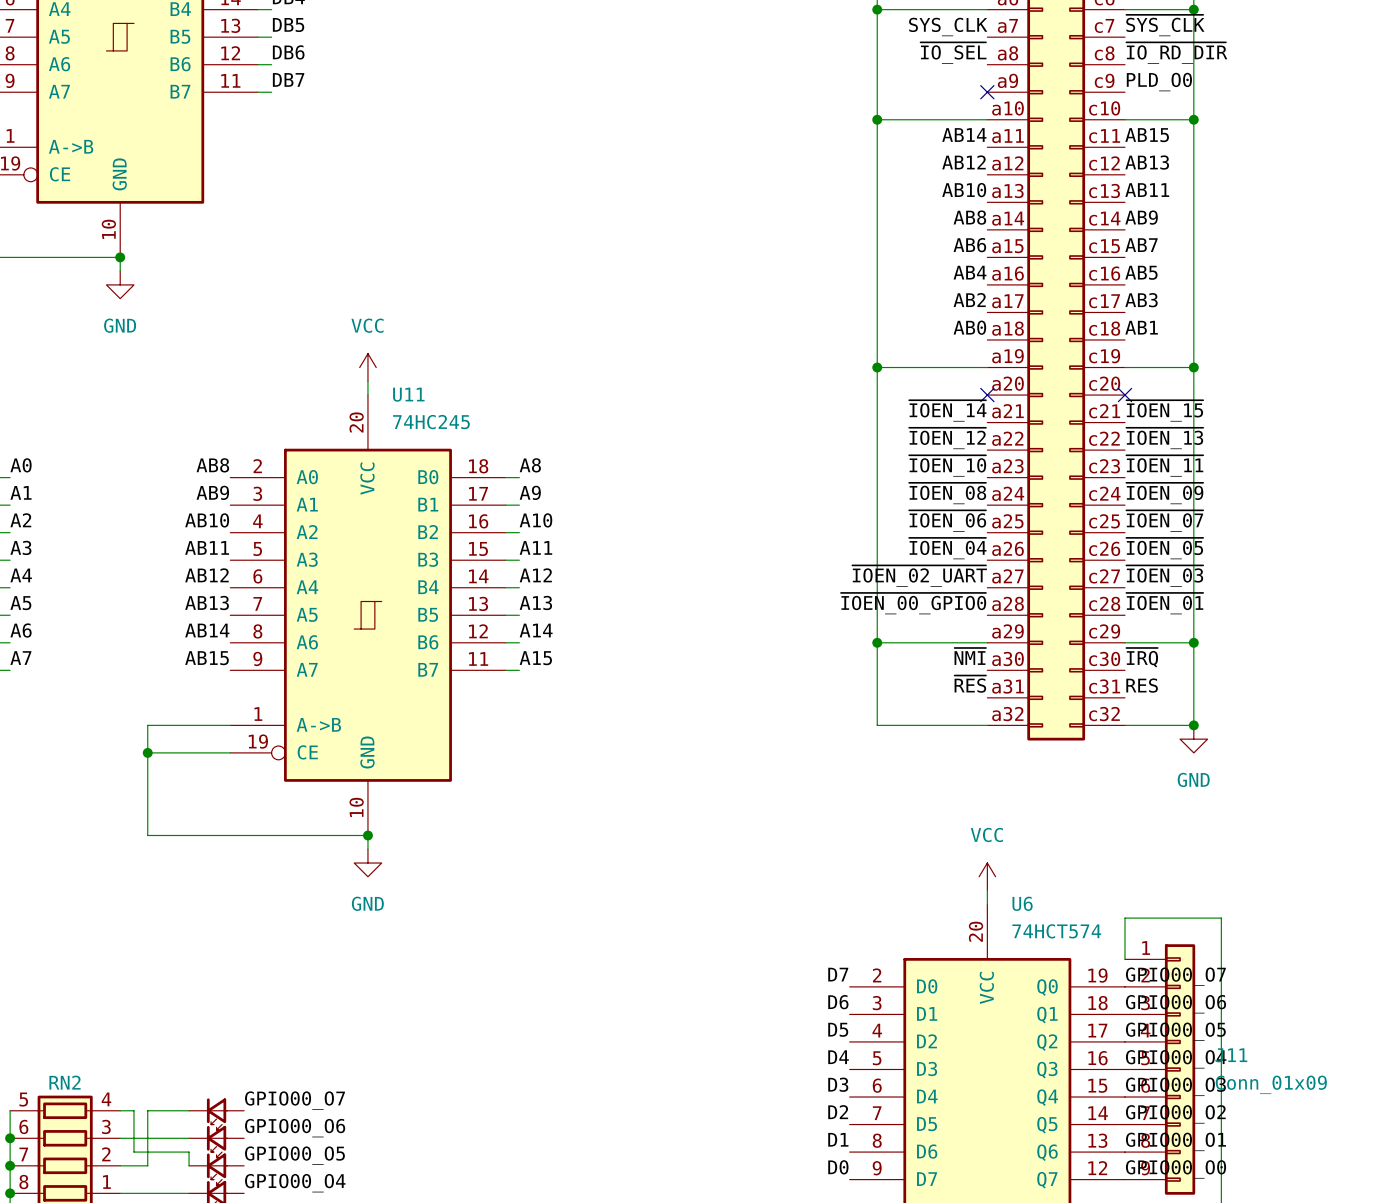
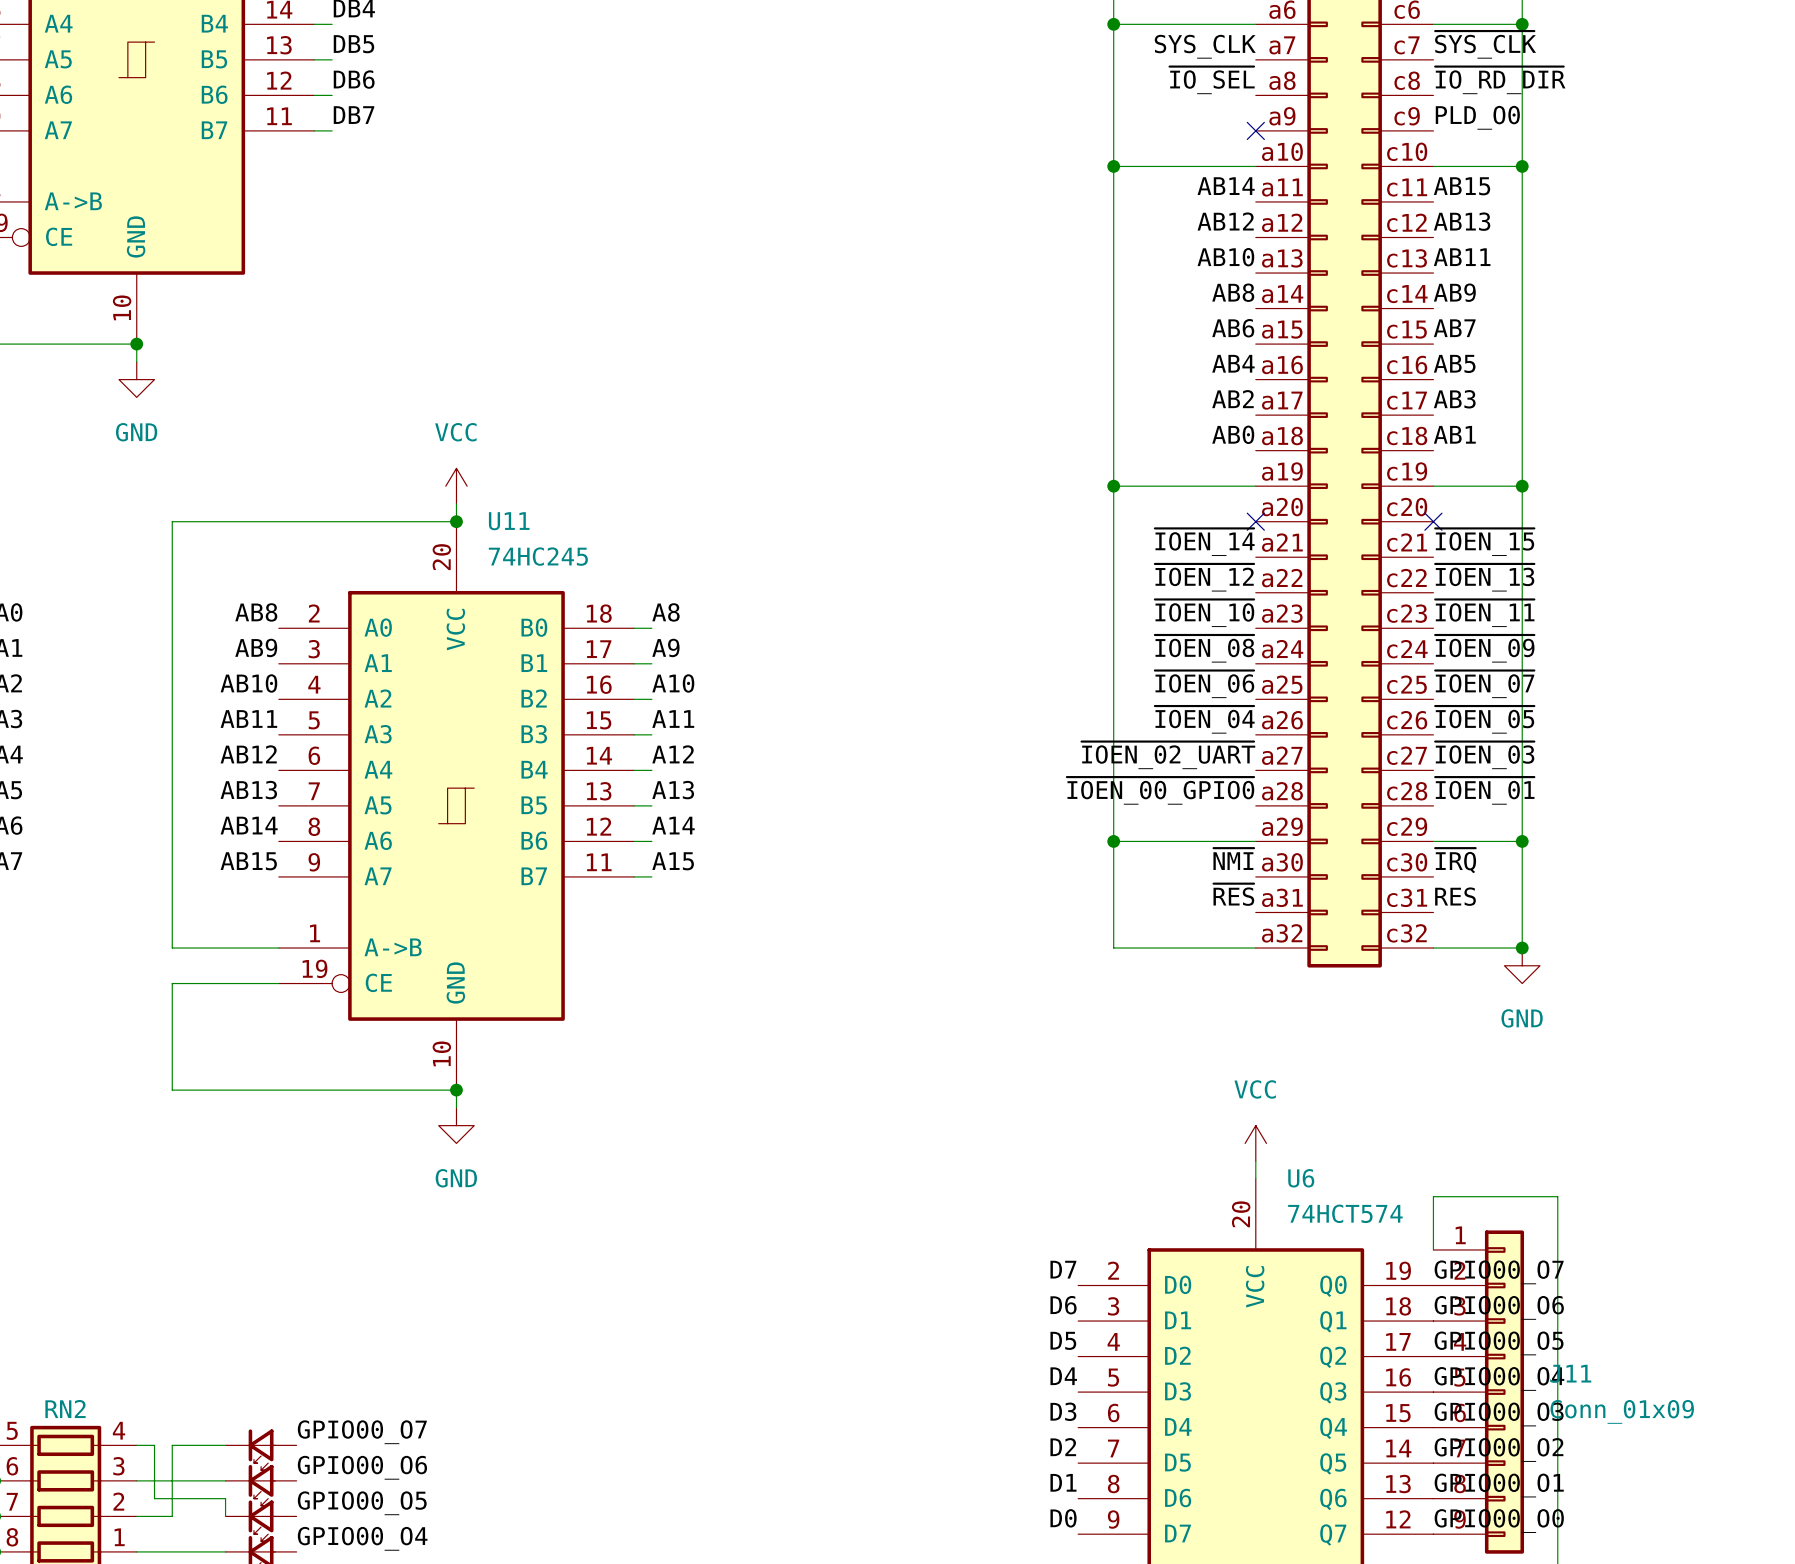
junction: none -> (456, 521)
wire: (147, 725) (147, 752) -> (172, 948) (172, 521) (456, 521)
junction: (147, 752) -> none

